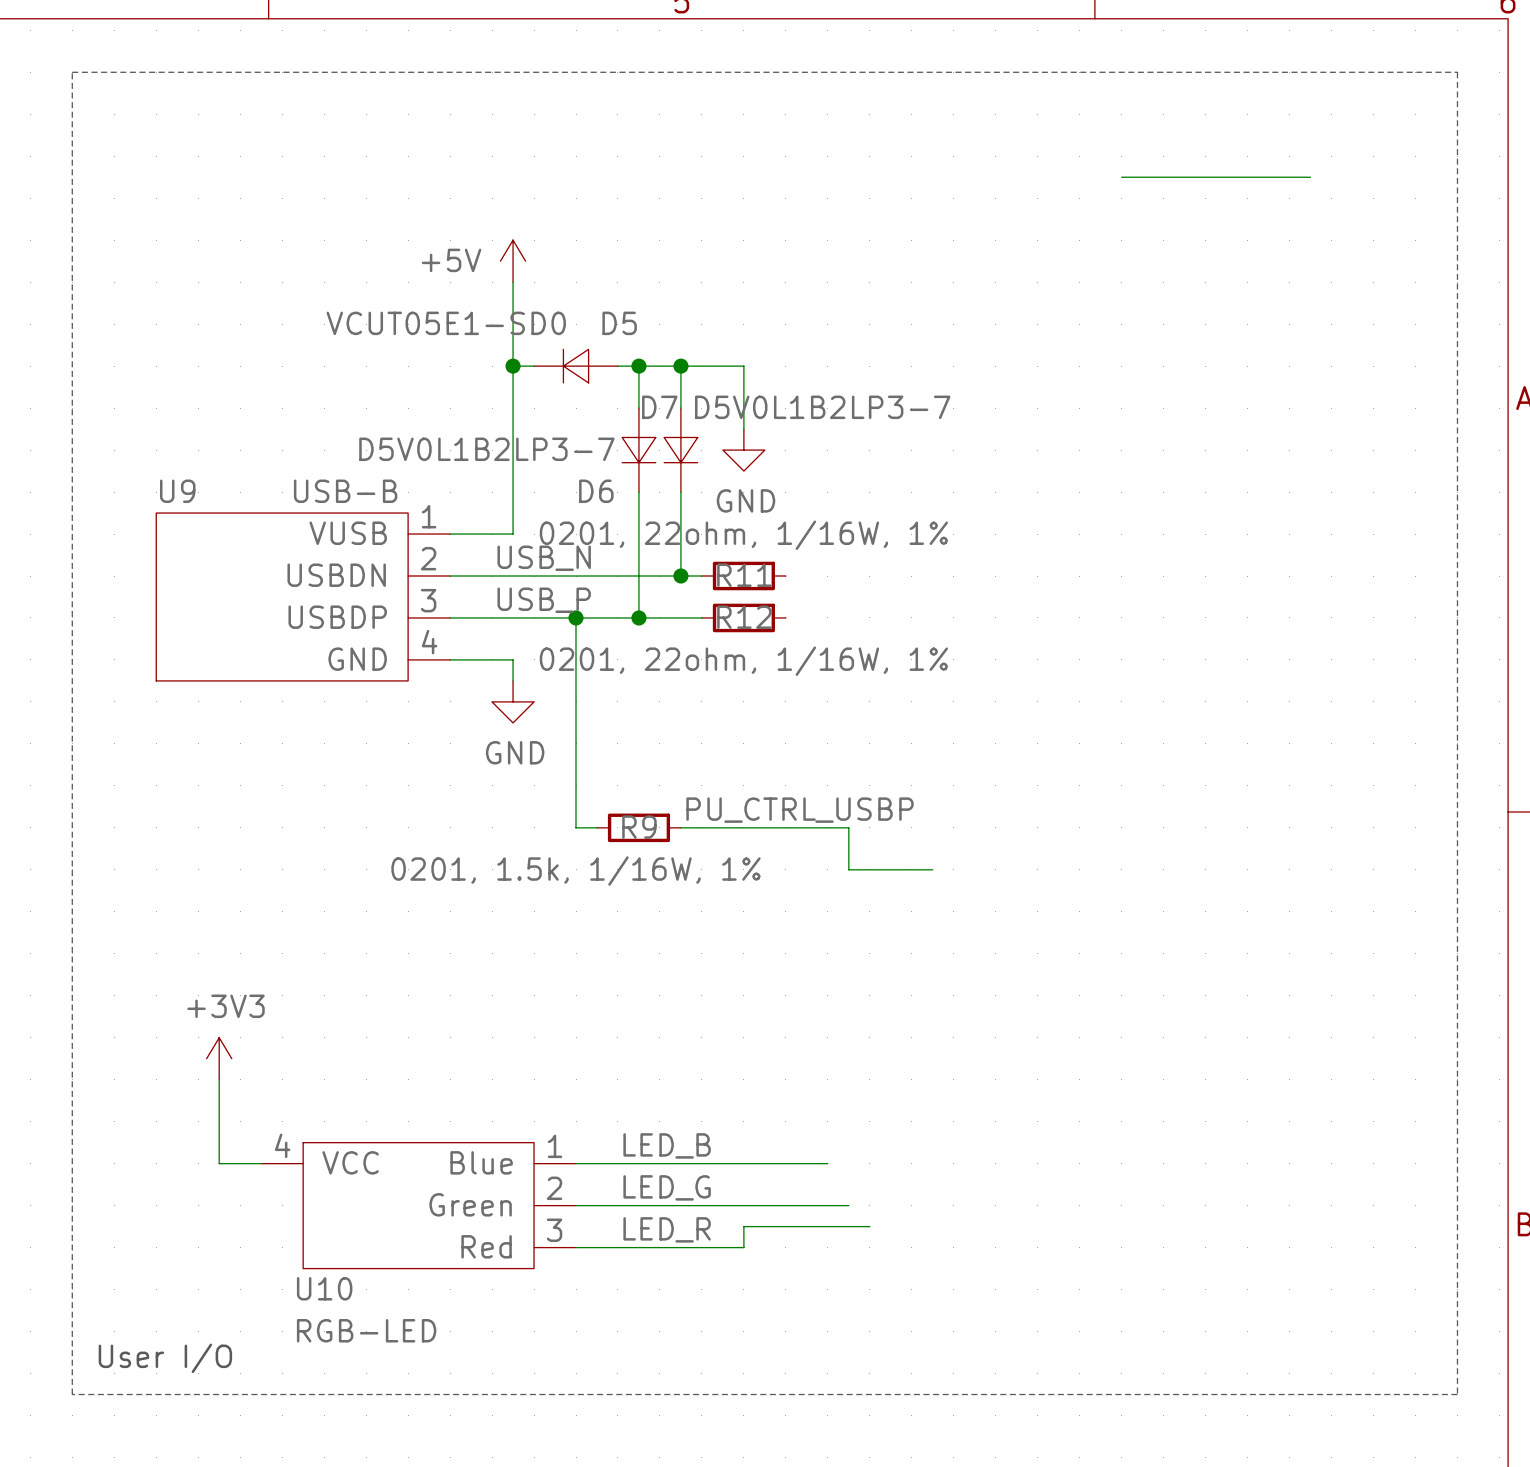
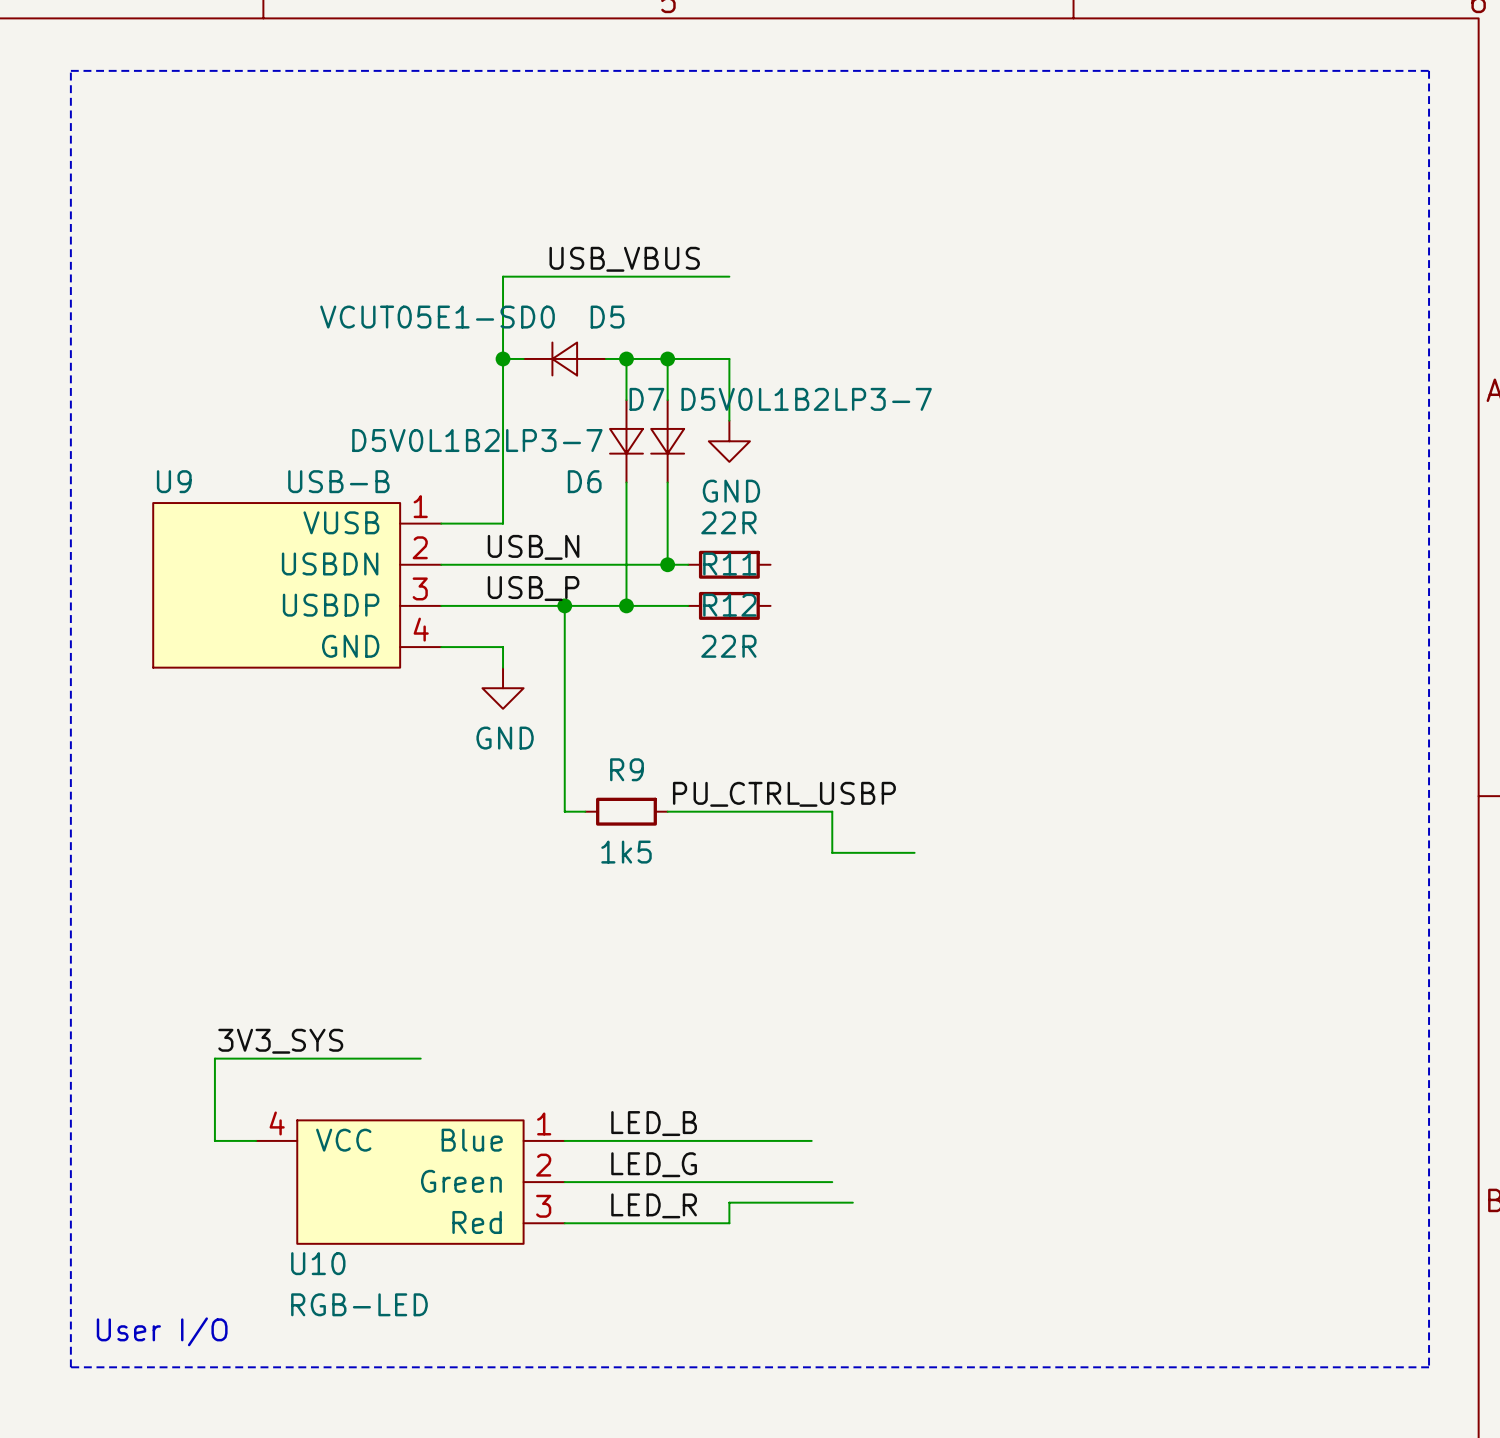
wire: (1121, 177) (1310, 177) -> none
power symbol: +5V (513, 261) -> none
label: none -> USB_VBUS (624, 259)
wire: none -> (503, 276) (729, 276)
R11 value: 0201, 22ohm, 1/16W, 1% (743, 535) -> 22R (728, 522)
R12 value: 0201, 22ohm, 1/16W, 1% (743, 661) -> 22R (728, 646)
R9 name position: R9 (639, 827) -> R9 (626, 769)
R9 value: 0201, 1.5k, 1/16W, 1% (576, 871) -> 1k5 (626, 852)
power symbol: +3V3 (219, 1058) -> none
label: none -> 3V3_SYS (280, 1041)
wire: none -> (214, 1058) (420, 1058)

